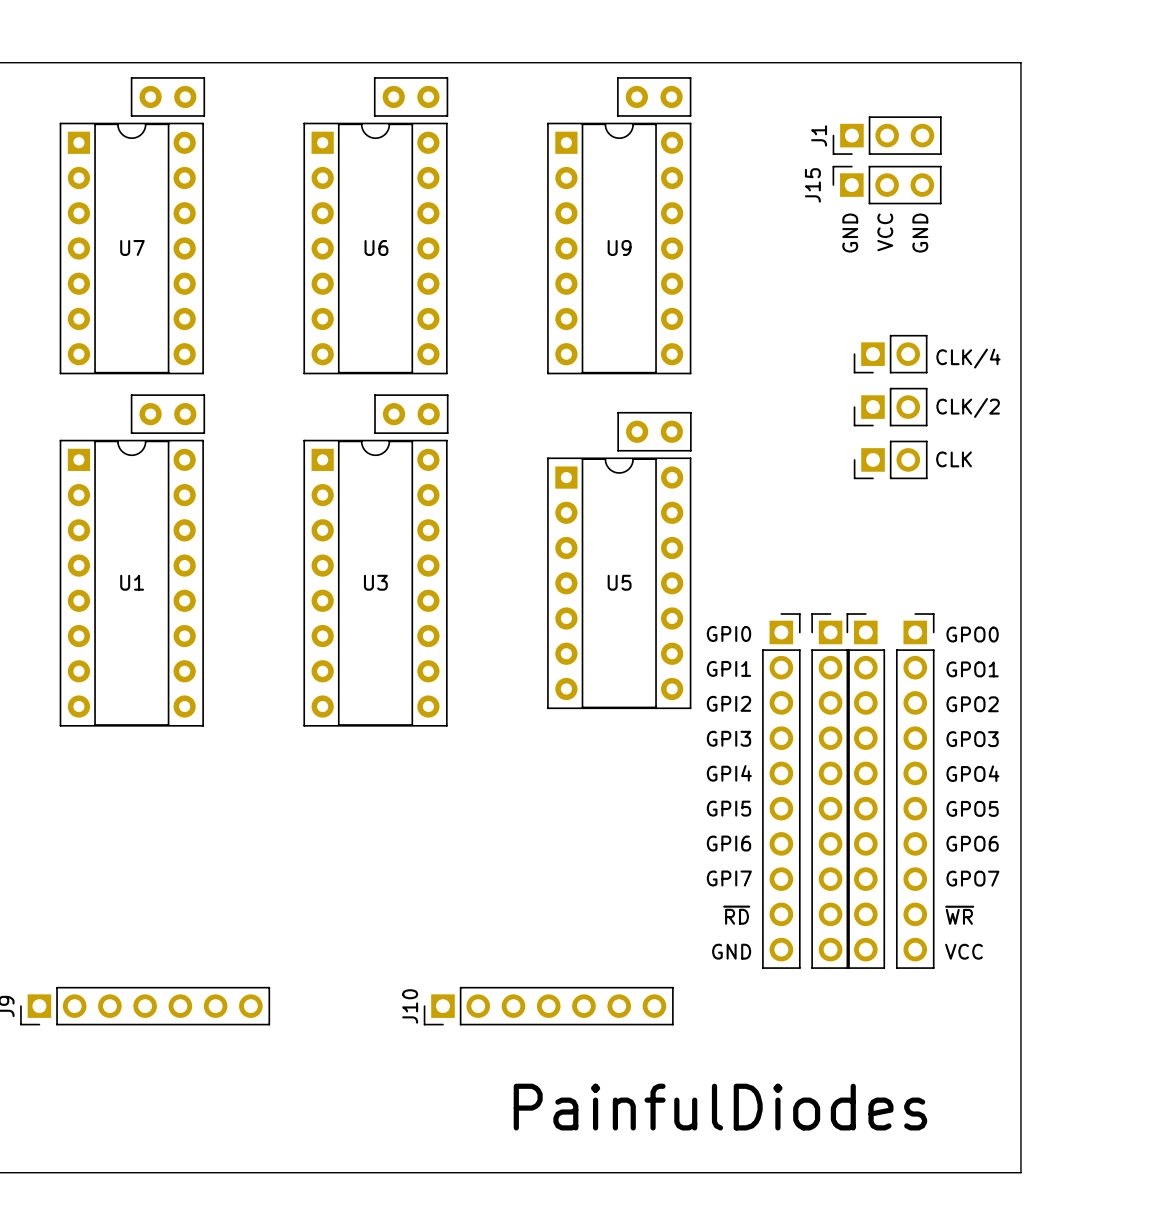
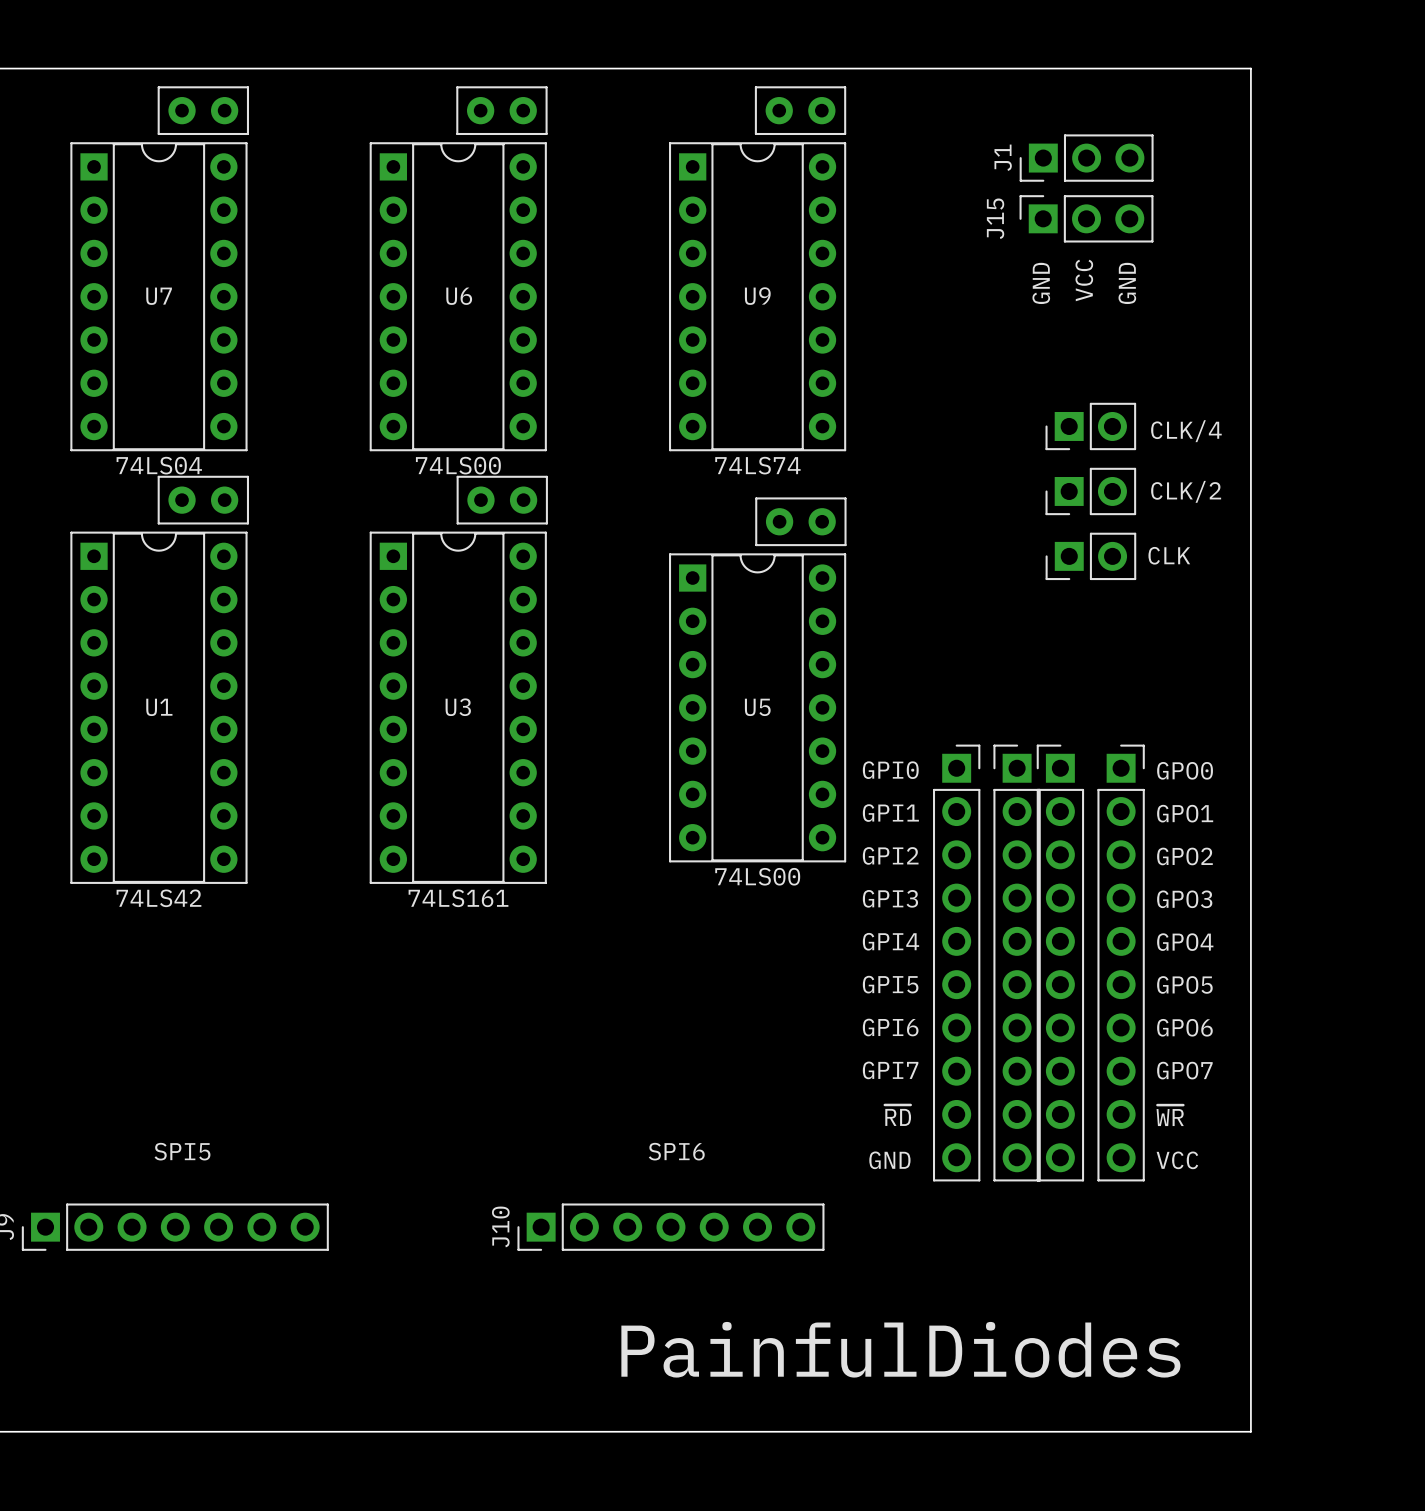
U7 value: none -> 74LS04 (159, 465)
U6 value: none -> 74LS00 (458, 465)
U9 value: none -> 74LS74 (757, 465)
U5 value: none -> 74LS00 (757, 876)
U1 value: none -> 74LS42 (158, 898)
U3 value: none -> 74LS161 (458, 898)
text: none -> SPI5 (182, 1151)
text: none -> SPI6 (676, 1151)

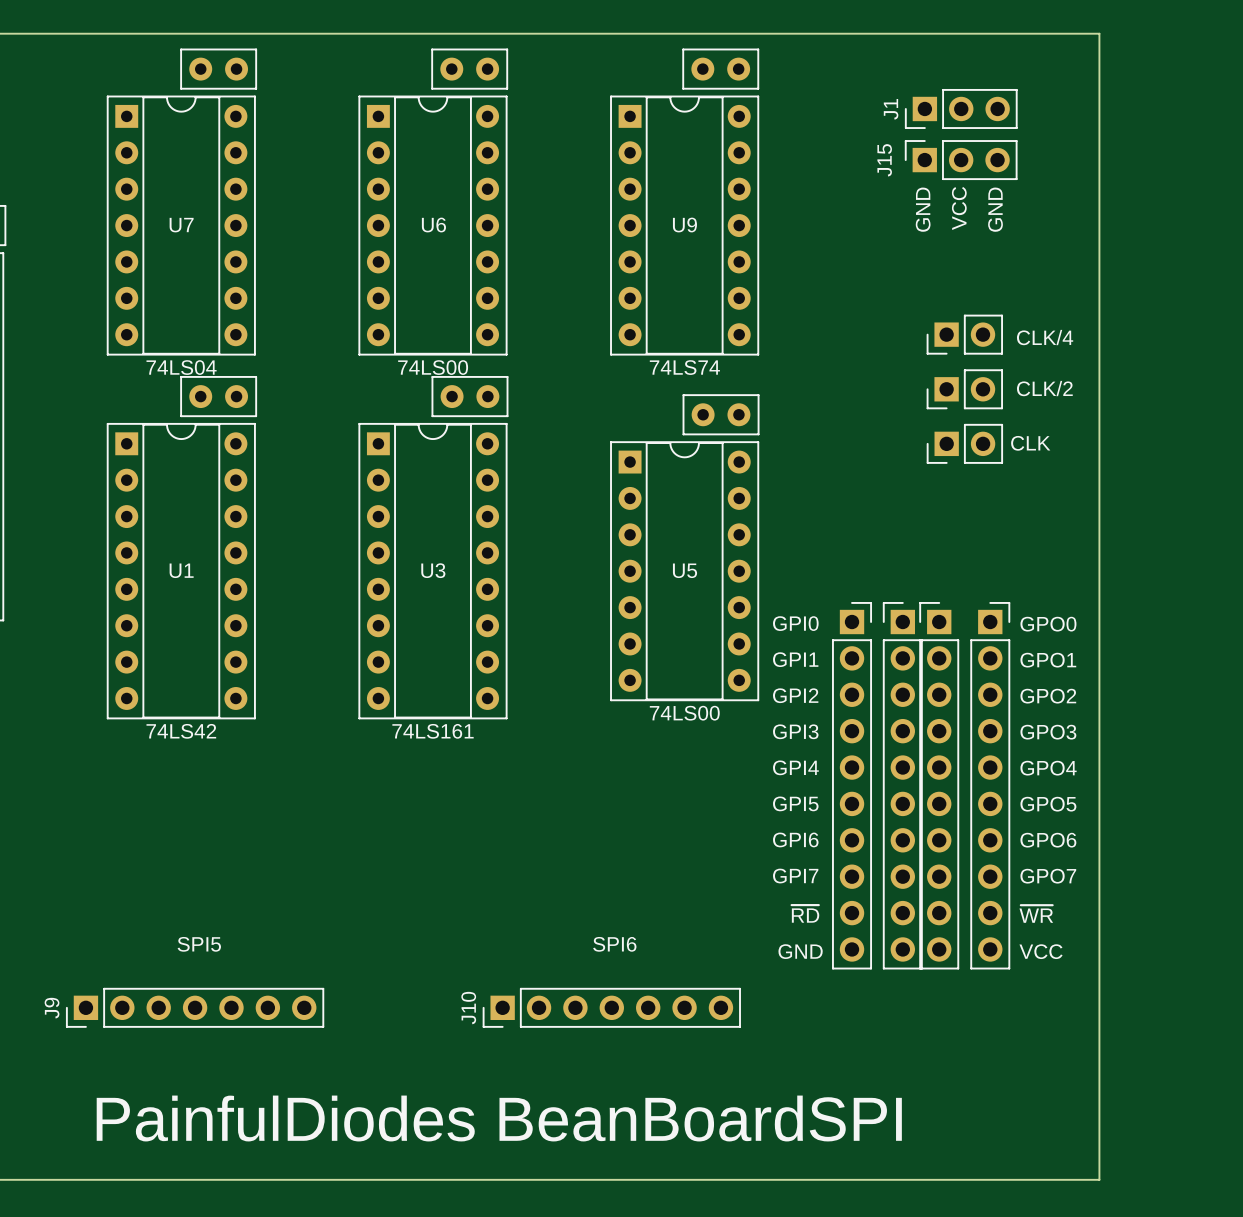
text: PainfulDiodes (900, 1349) -> none
text: none -> PainfulDiodes BeanBoardSPI (499, 1118)

